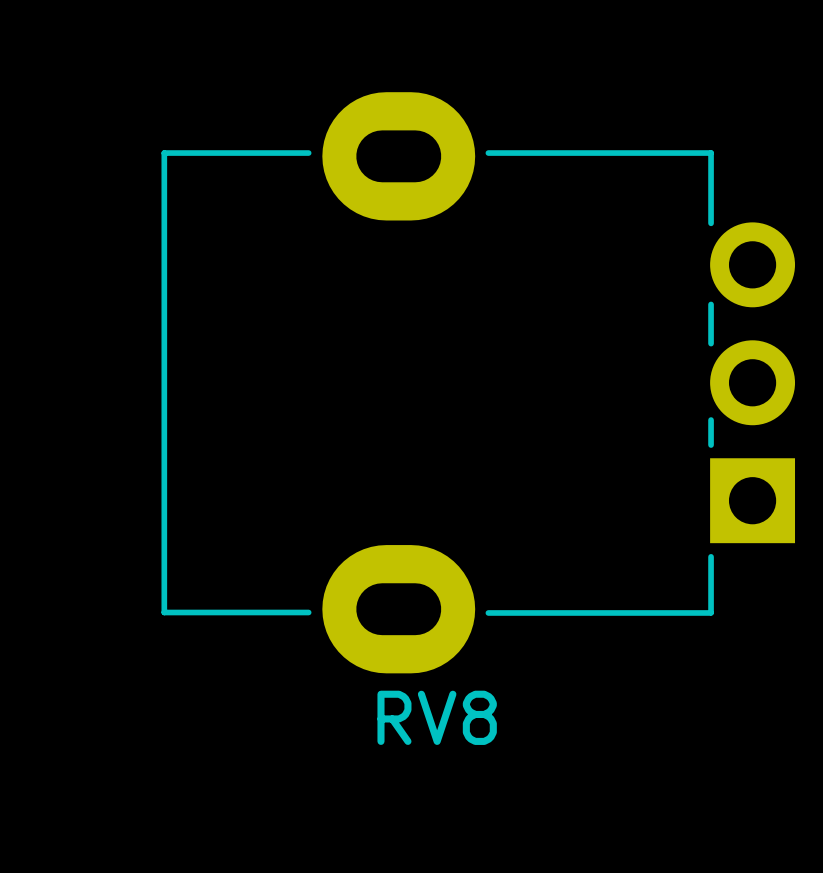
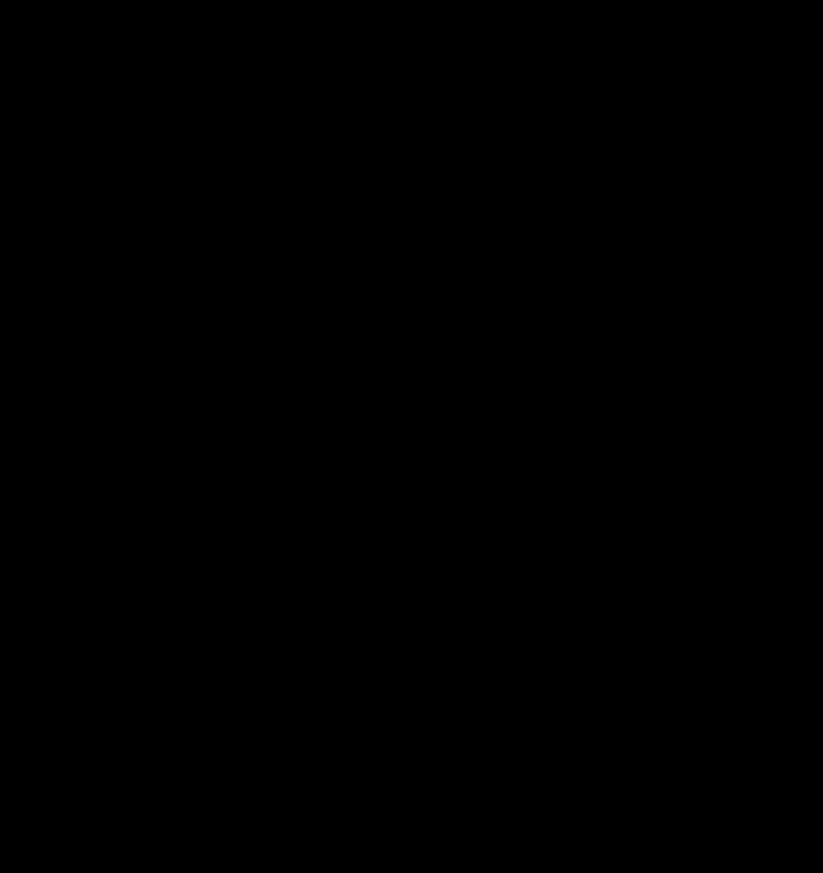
RV8: (478, 382) -> none

